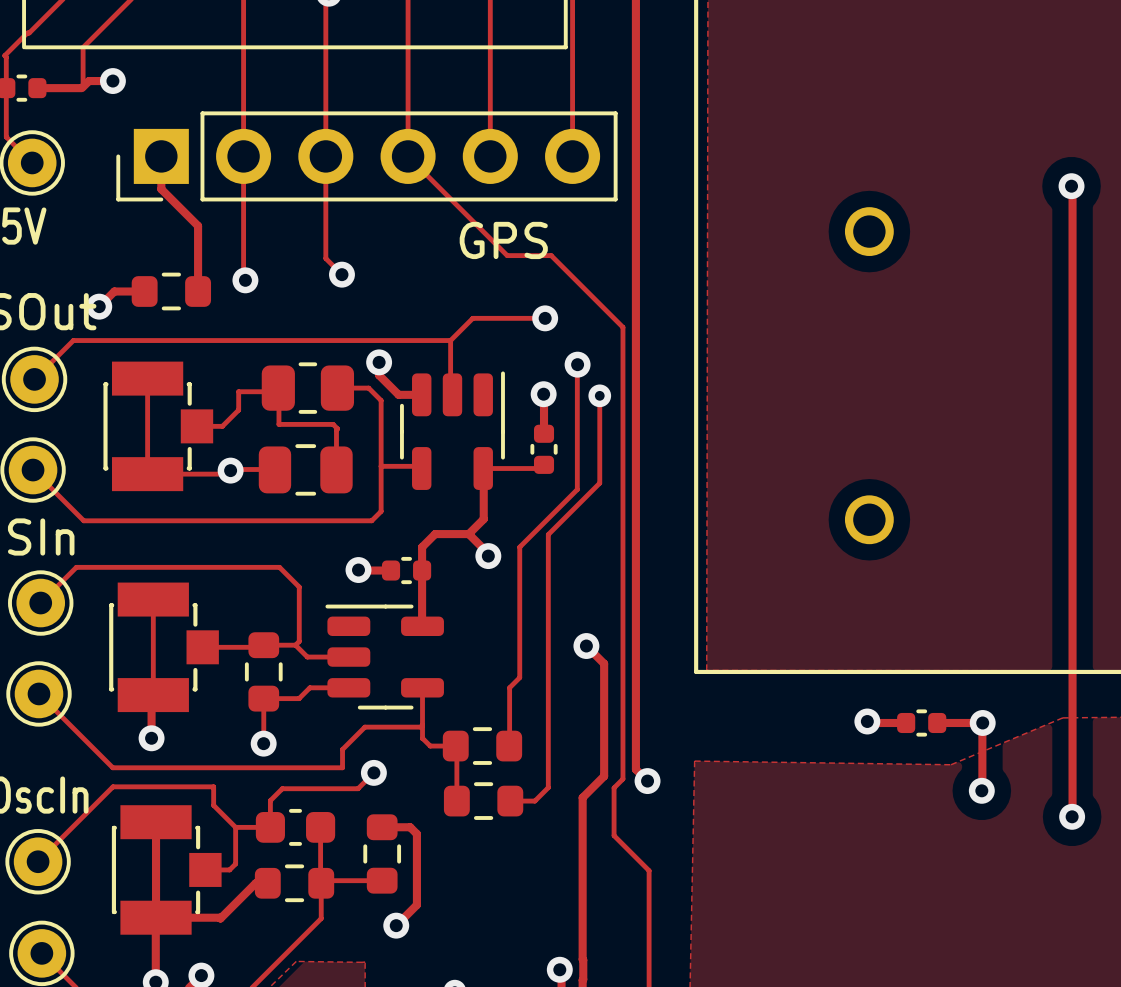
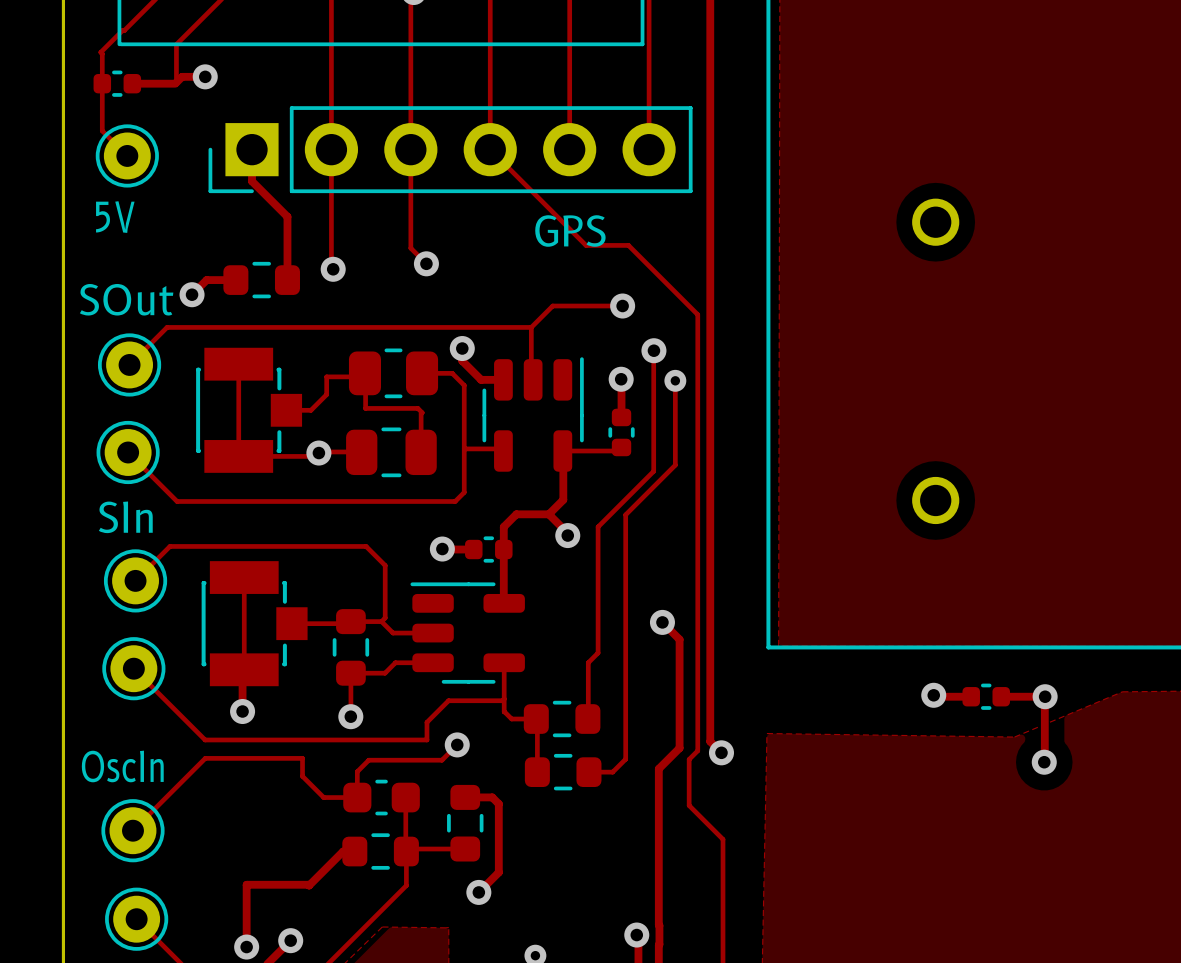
track: (1071, 186) (1072, 816) -> none
via: (1071, 186) -> none
via: (1072, 816) -> none
track: (156, 822) (156, 917) -> none
track: (235, 827) (235, 863) (229, 869) (205, 869) -> none
part: (166, 869) -> none

